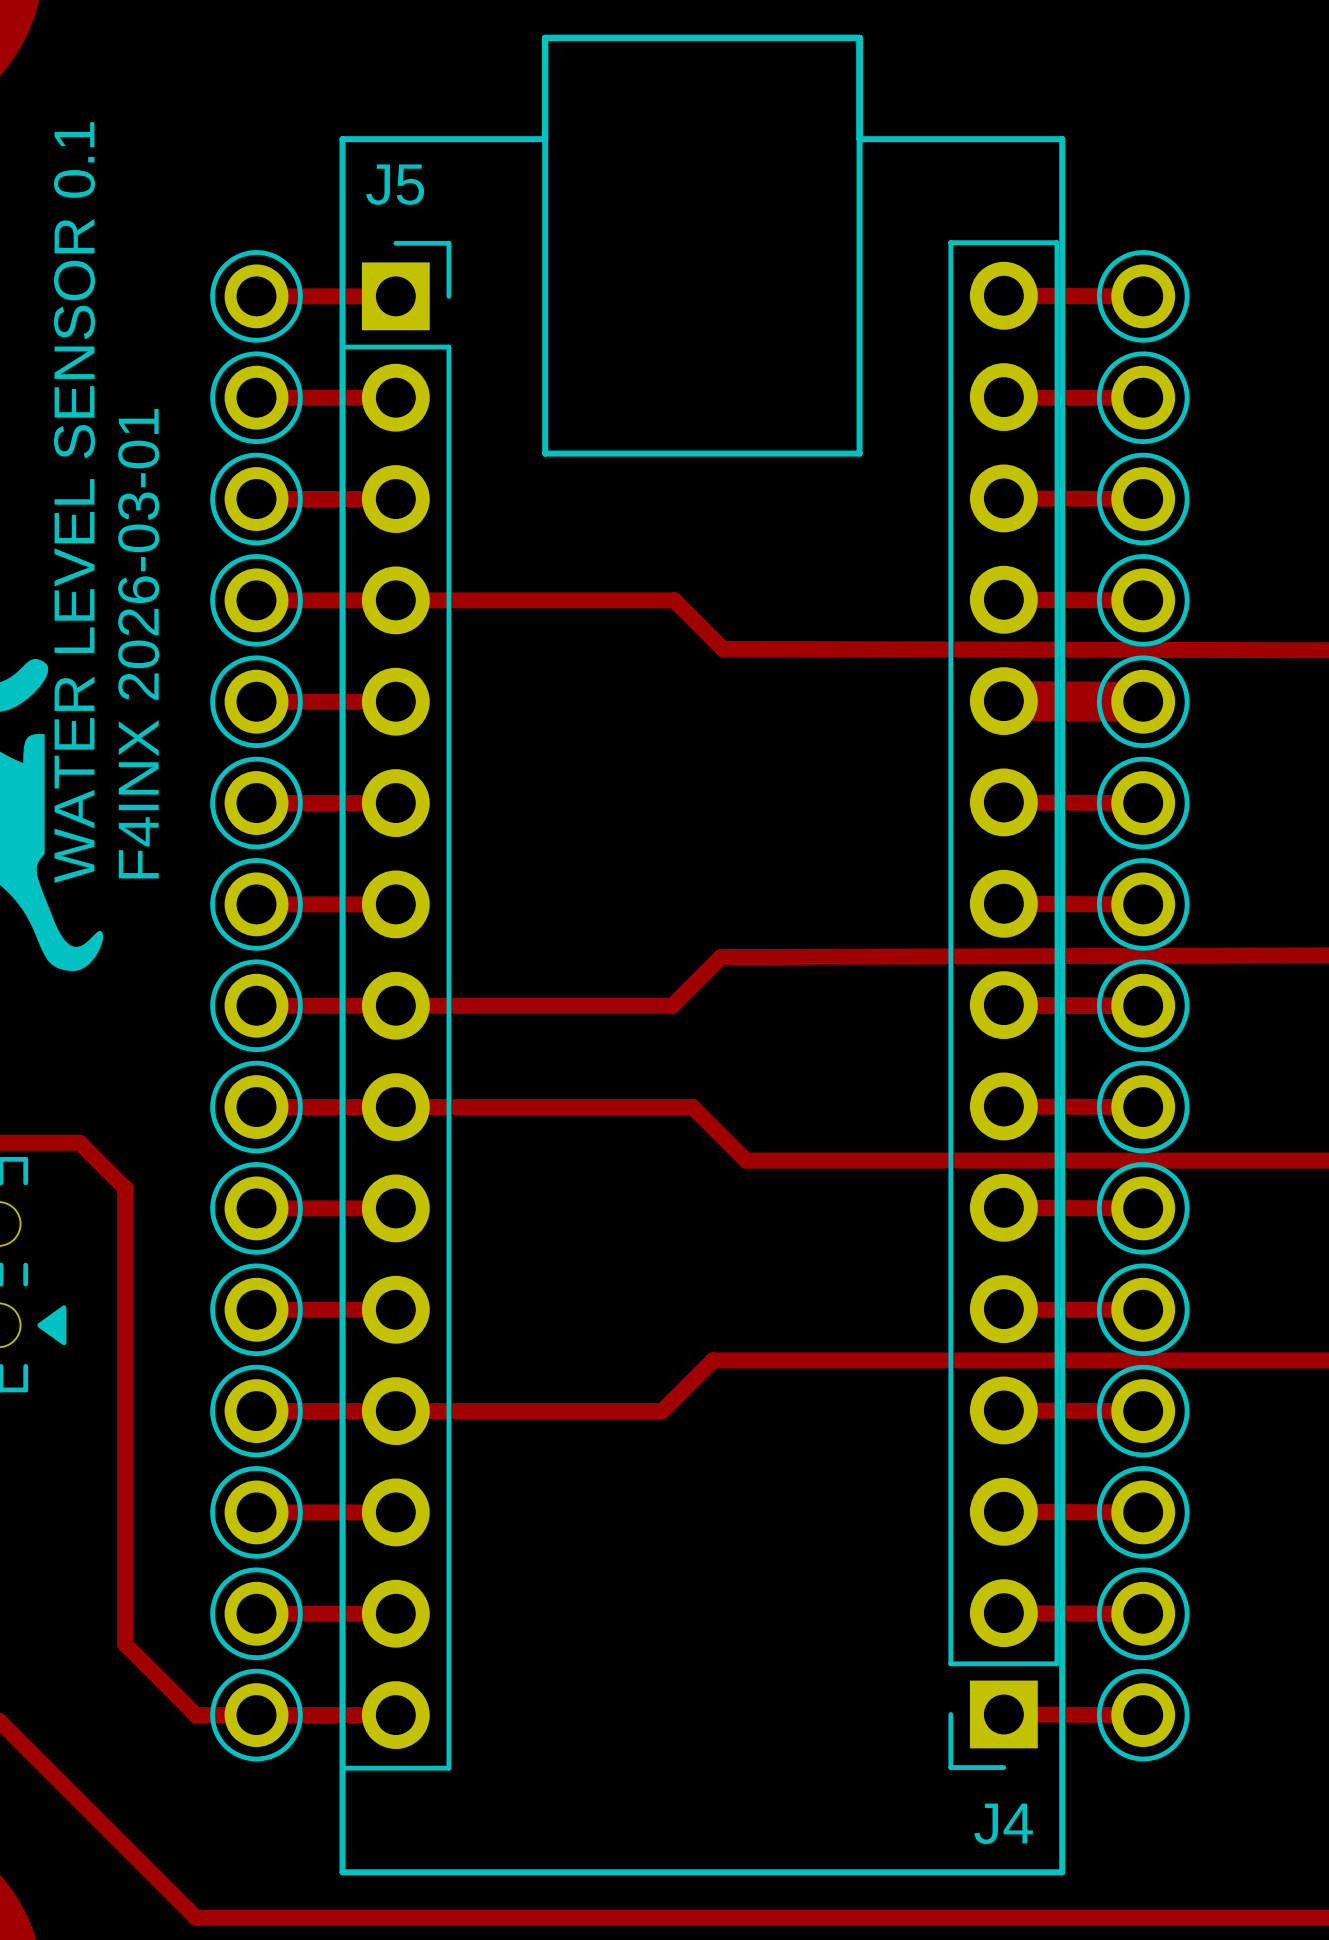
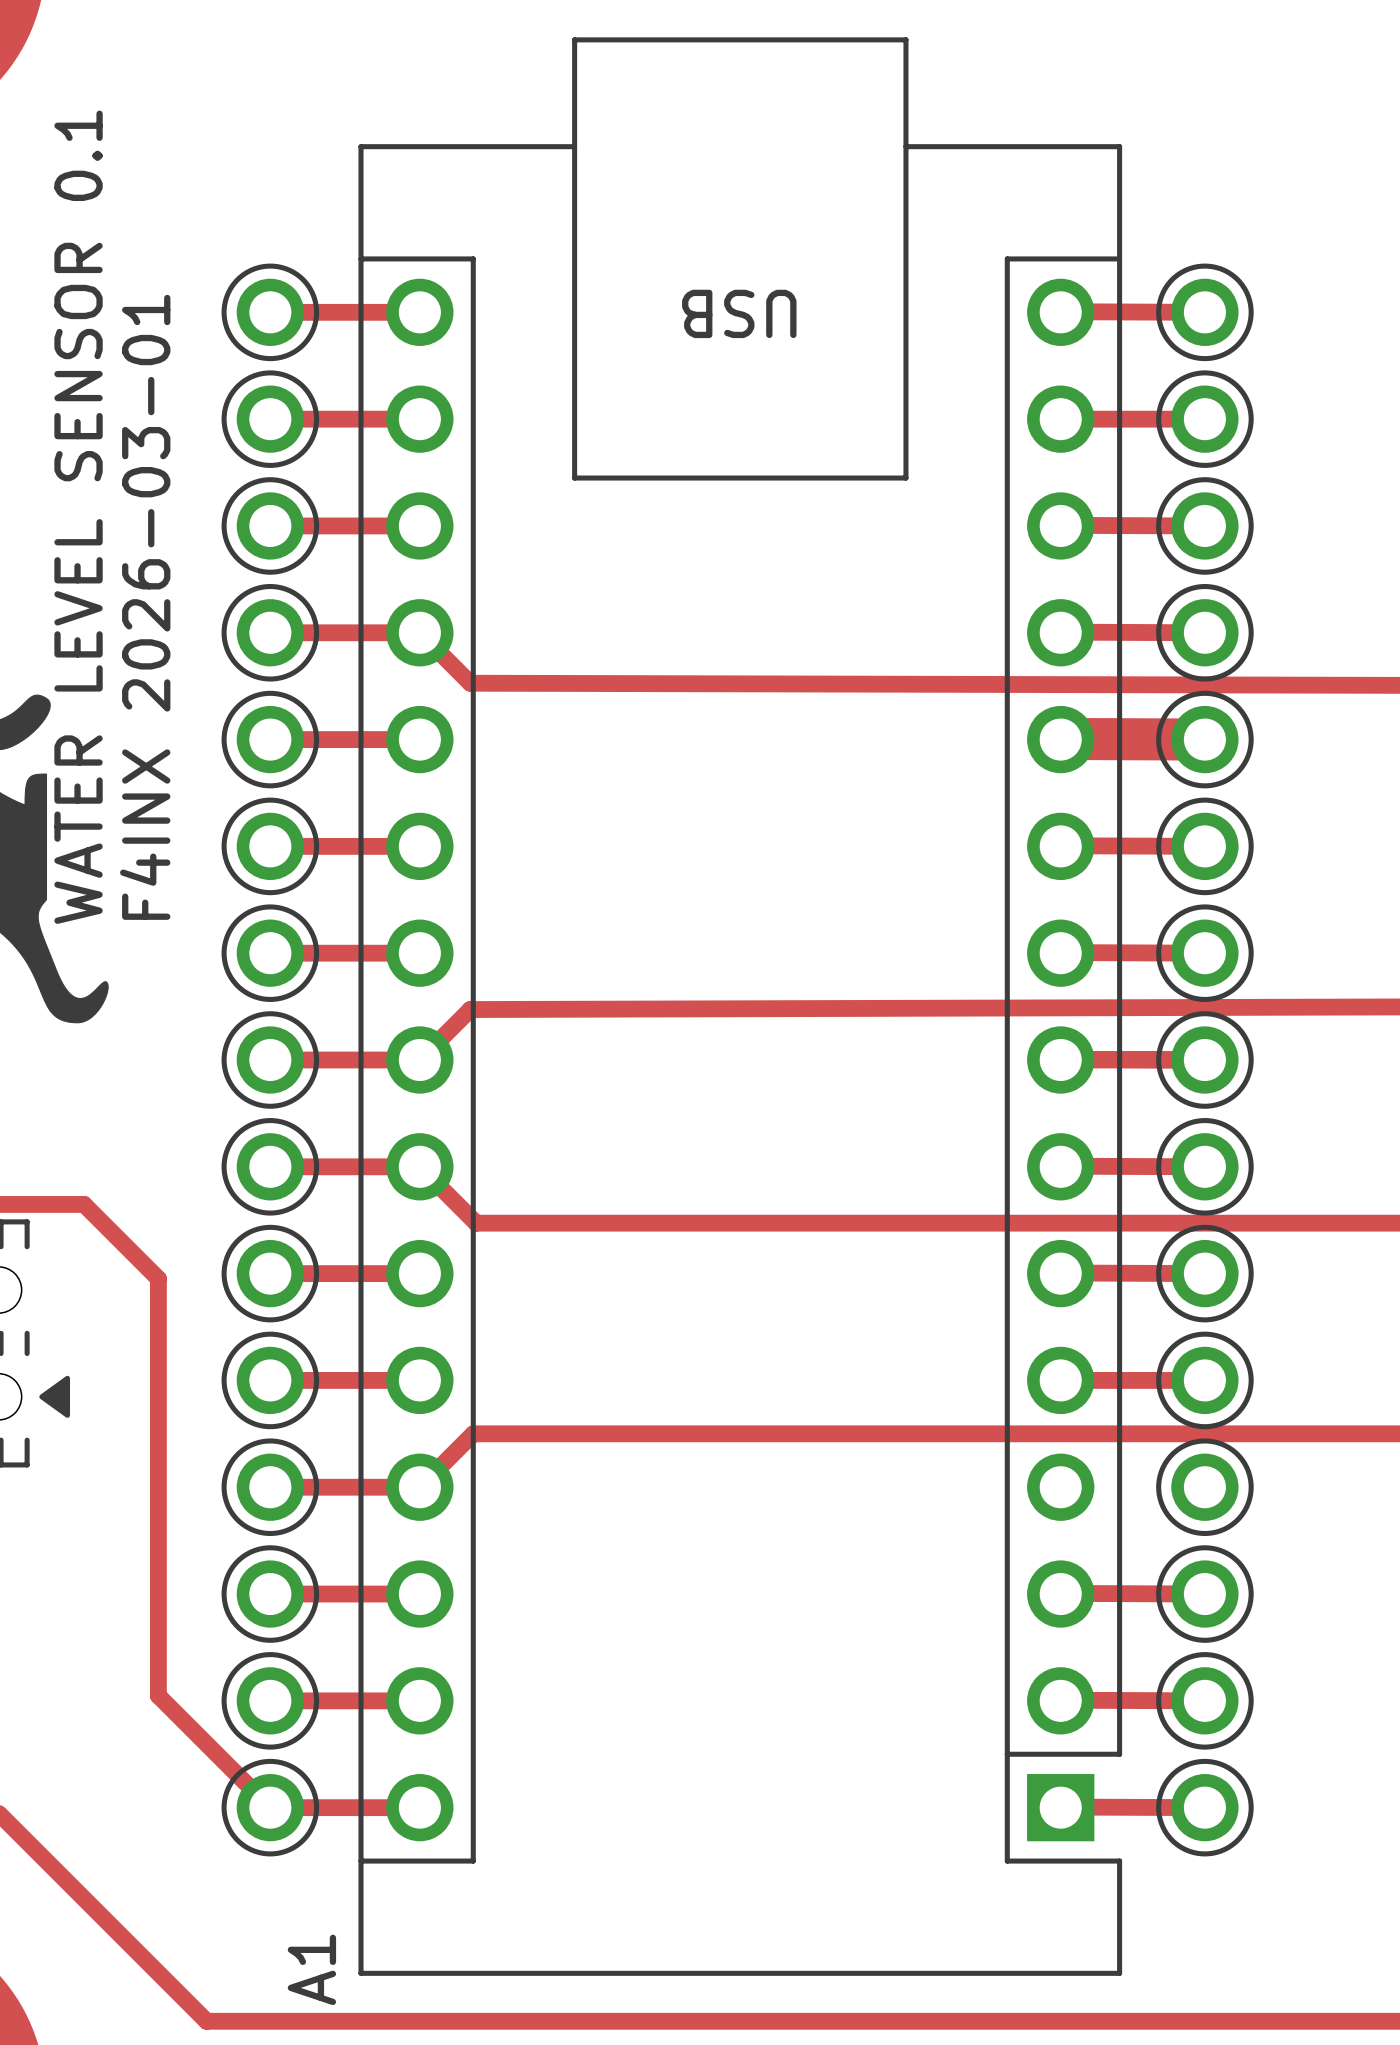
line: (545, 37) (545, 453) (859, 453) (859, 37) (545, 37) -> none
line: (545, 139) (342, 139) (342, 1872) (1062, 1872) (1062, 139) (859, 139) -> none
track: (398, 600) (674, 600) (723, 648) -> (419, 632) (470, 683) (762, 683)
A1: none -> (740, 1006)
track: (783, 956) (721, 956) (672, 1005) (398, 1005) -> (826, 1008) (470, 1009) (419, 1060)
J5: (395, 1005) -> none
J4: (1003, 1005) -> none
track: (398, 1107) (692, 1107) (746, 1160) -> (419, 1166) (476, 1223) (786, 1223)
track: (125, 1188) (125, 1644) (196, 1715) (256, 1715) -> (131, 1252) (158, 1278) (158, 1695) (270, 1807)
track: (712, 1360) (662, 1411) (398, 1411) -> (751, 1433) (473, 1433) (419, 1487)
track: (1003, 1410) (1143, 1411) -> none

